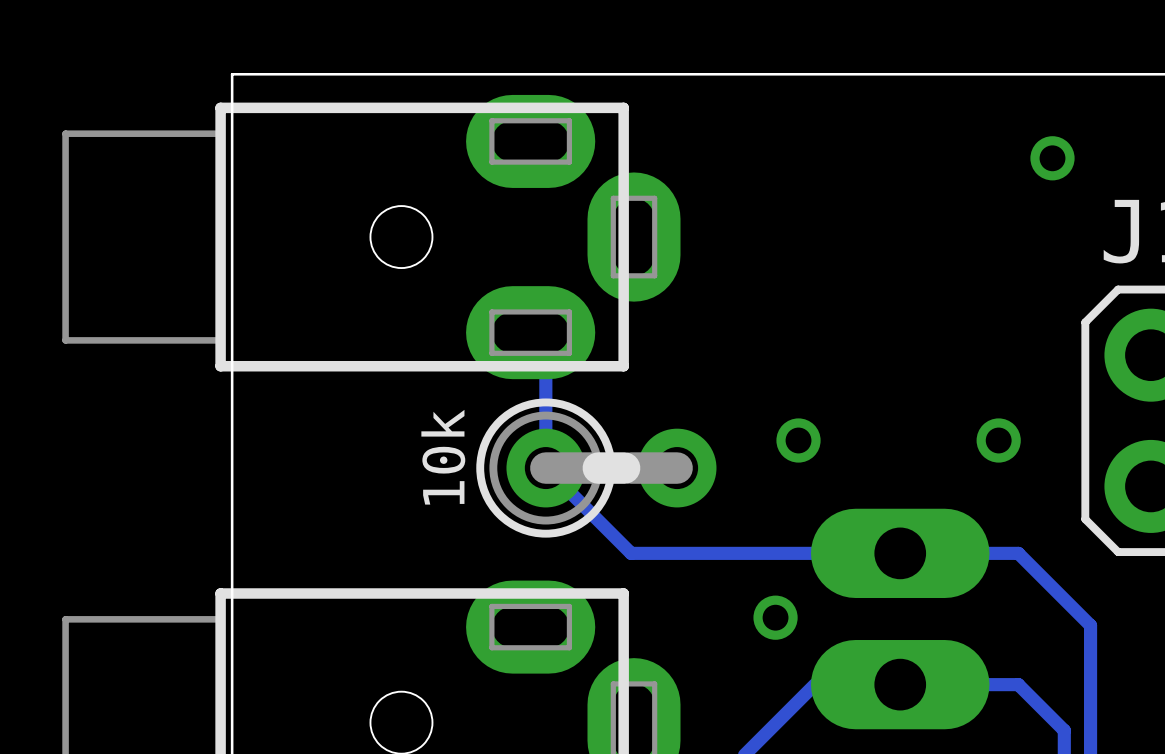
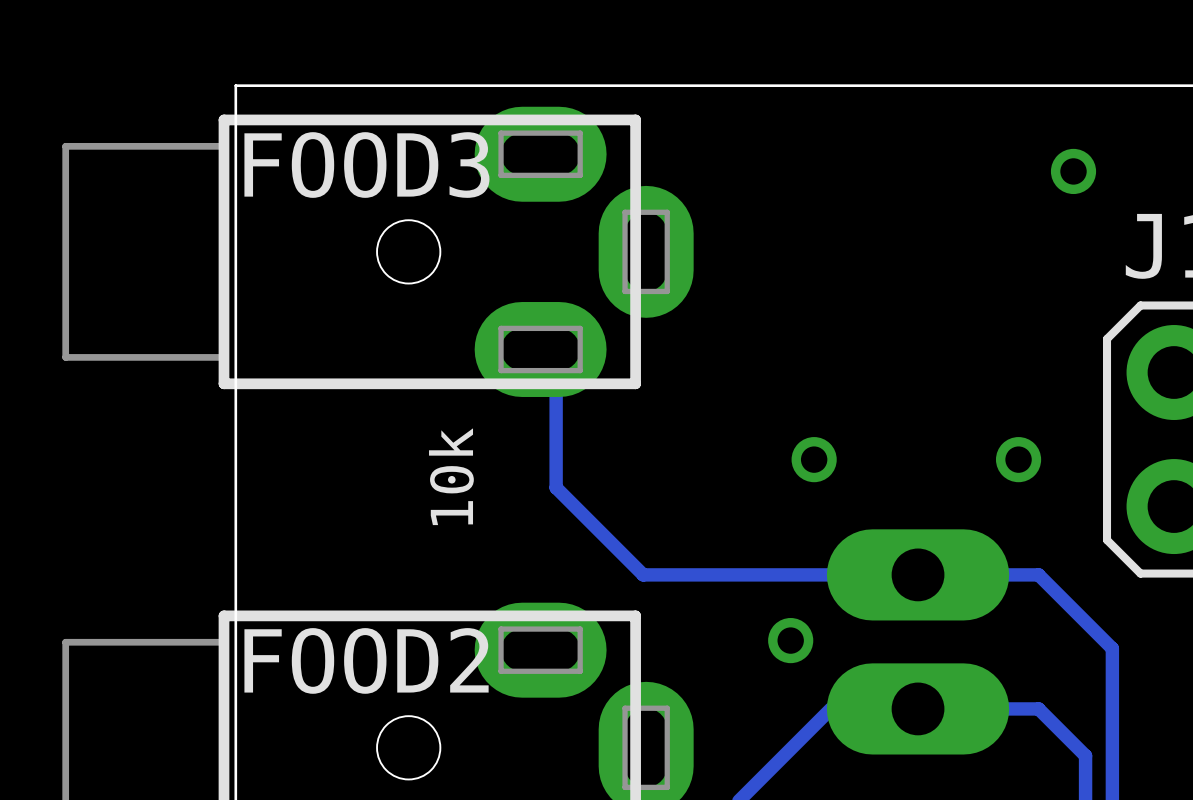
part value: none -> FOOD3 (366, 165)
part: (596, 468) -> none
part value: none -> FOOD2 (366, 660)

